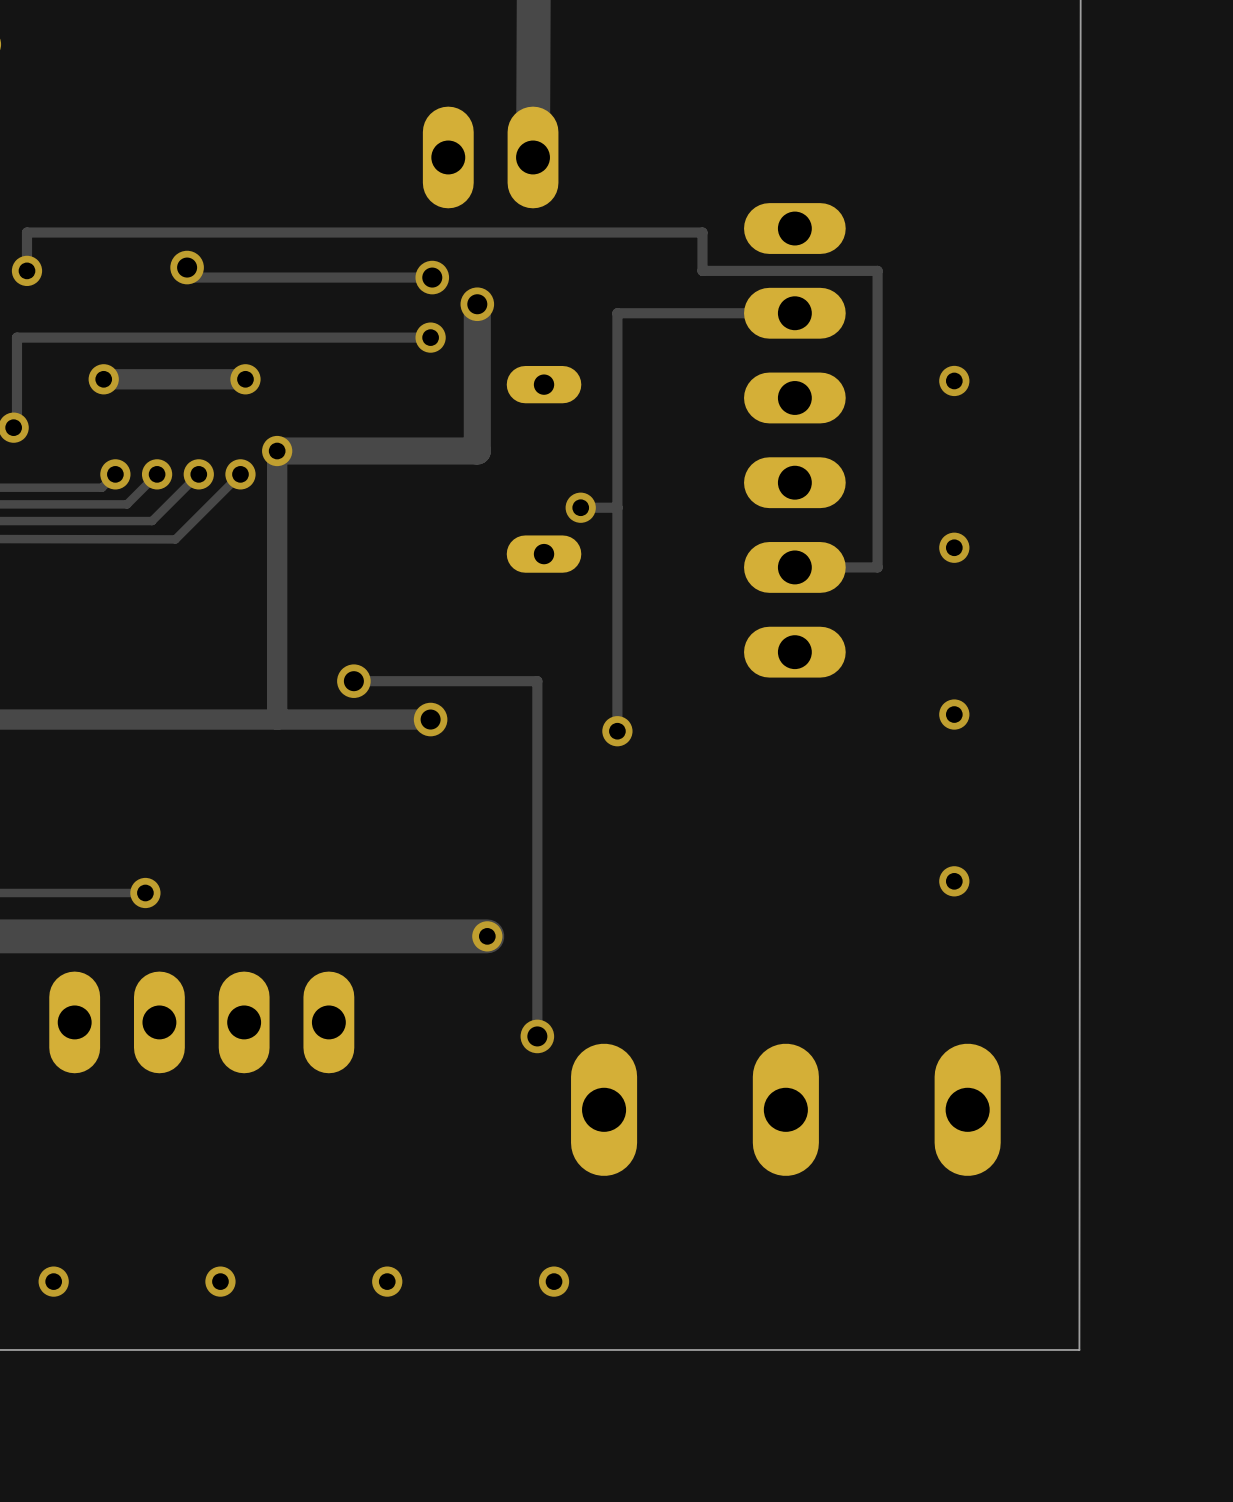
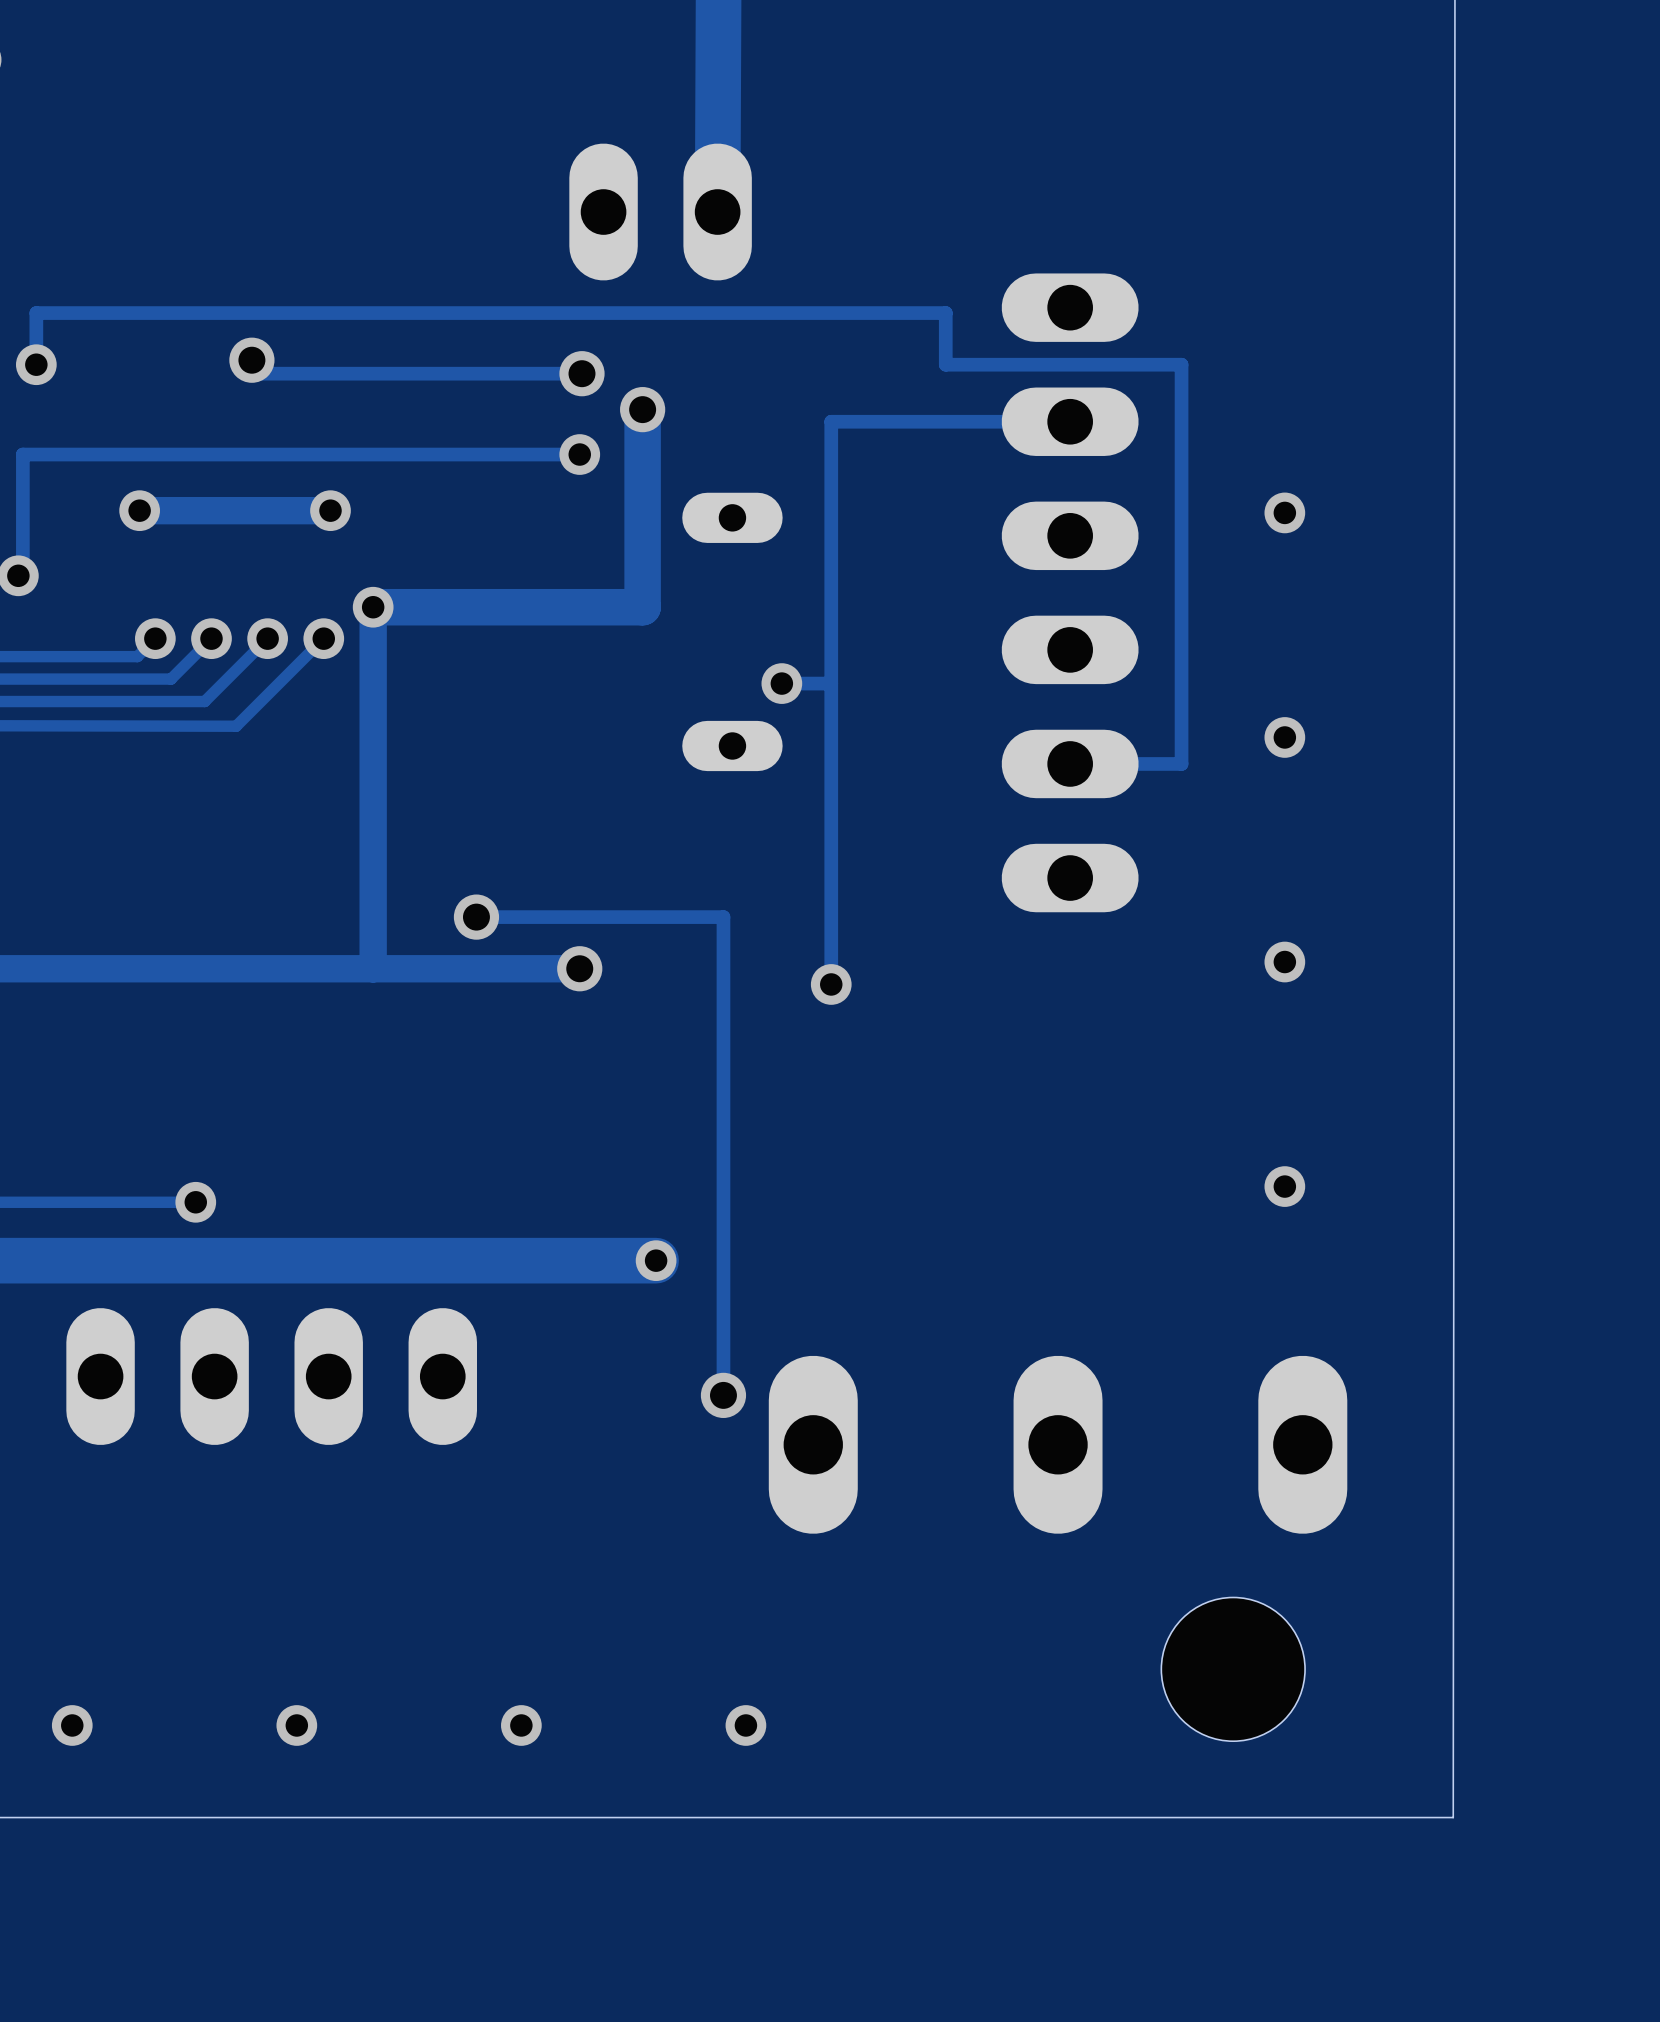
part position: (604, 1109) -> (813, 1444)
part position: (785, 1109) -> (1058, 1444)
part position: (967, 1109) -> (1302, 1444)
hole: none -> (1233, 1669)

